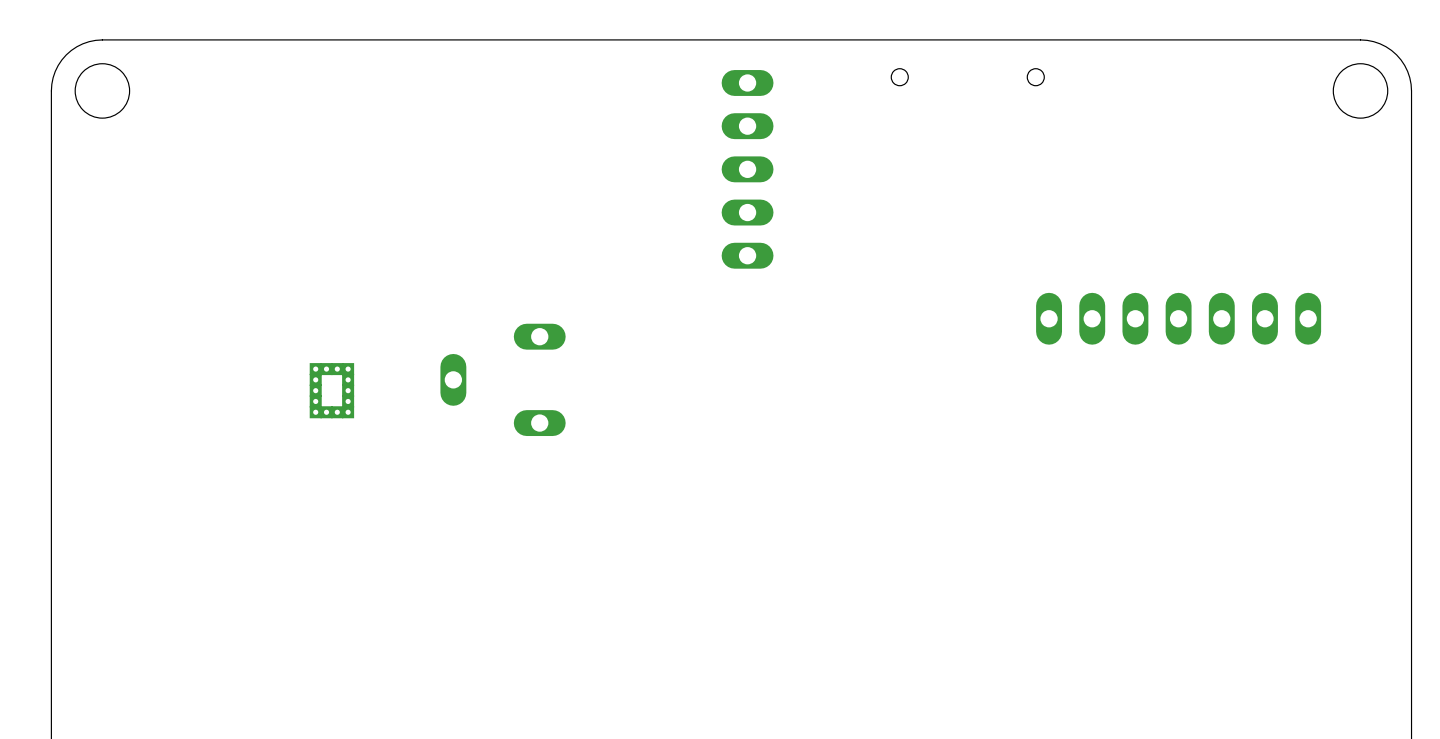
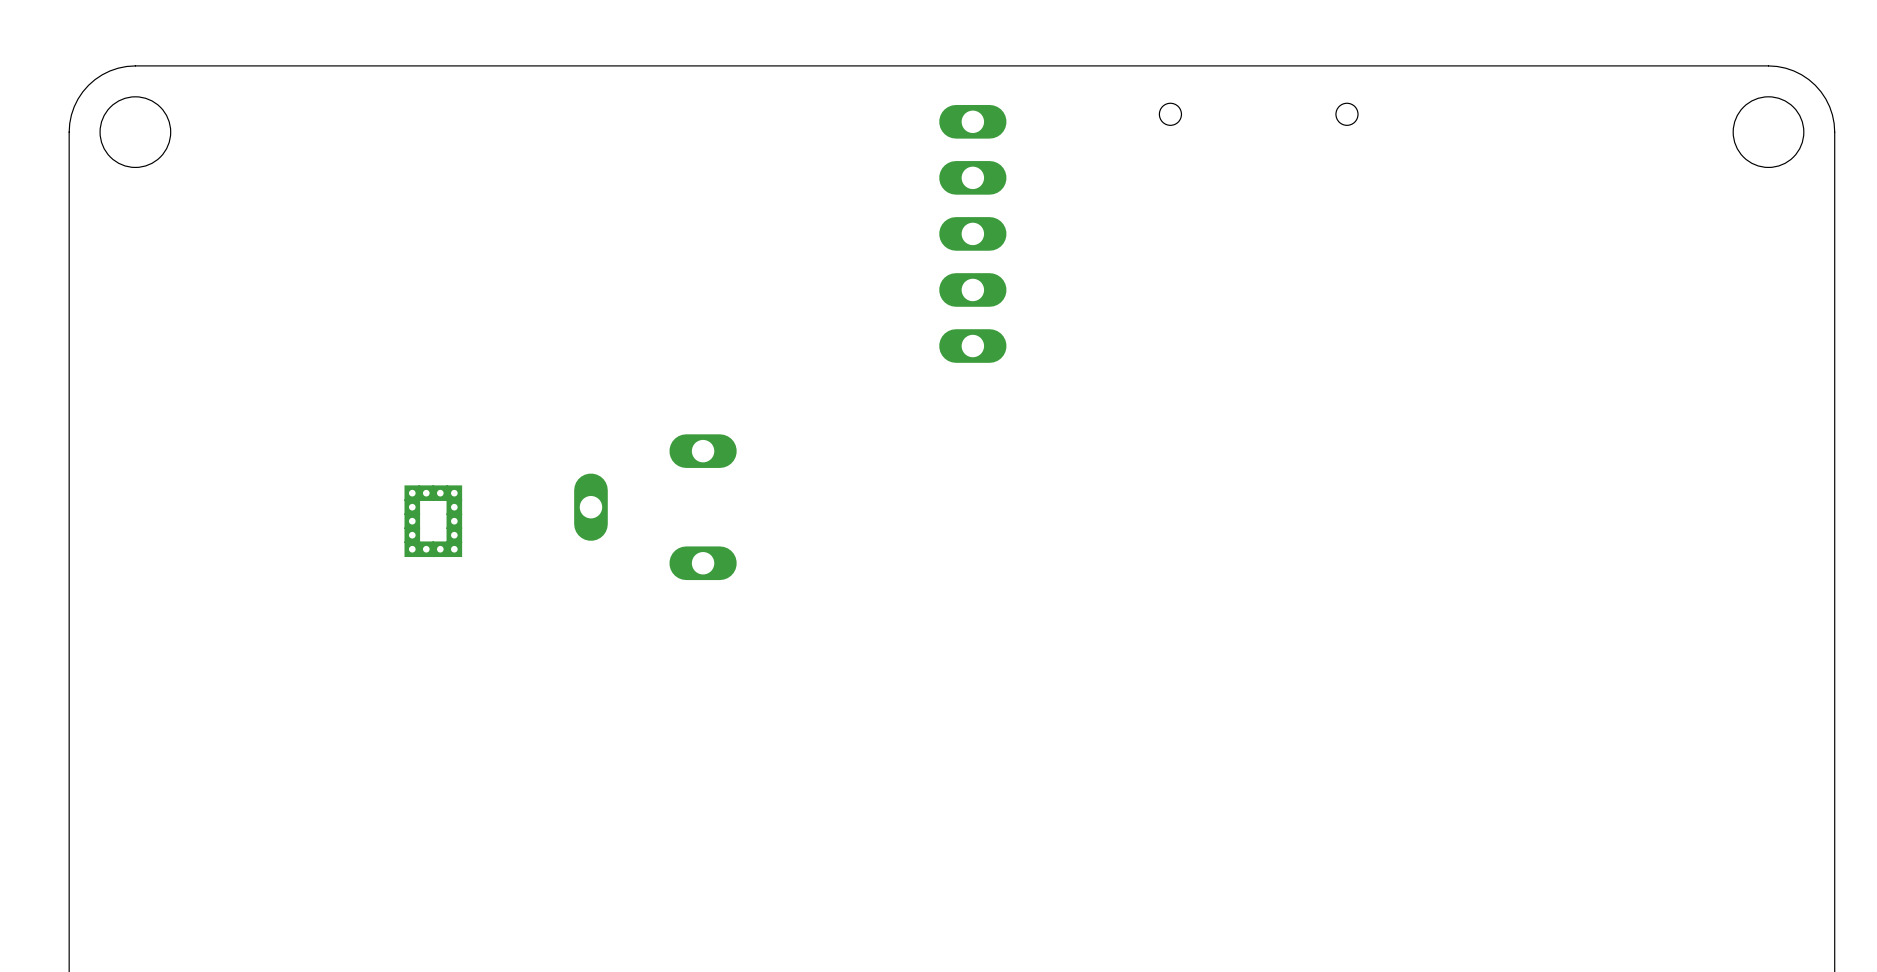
part: (1178, 318) -> none

